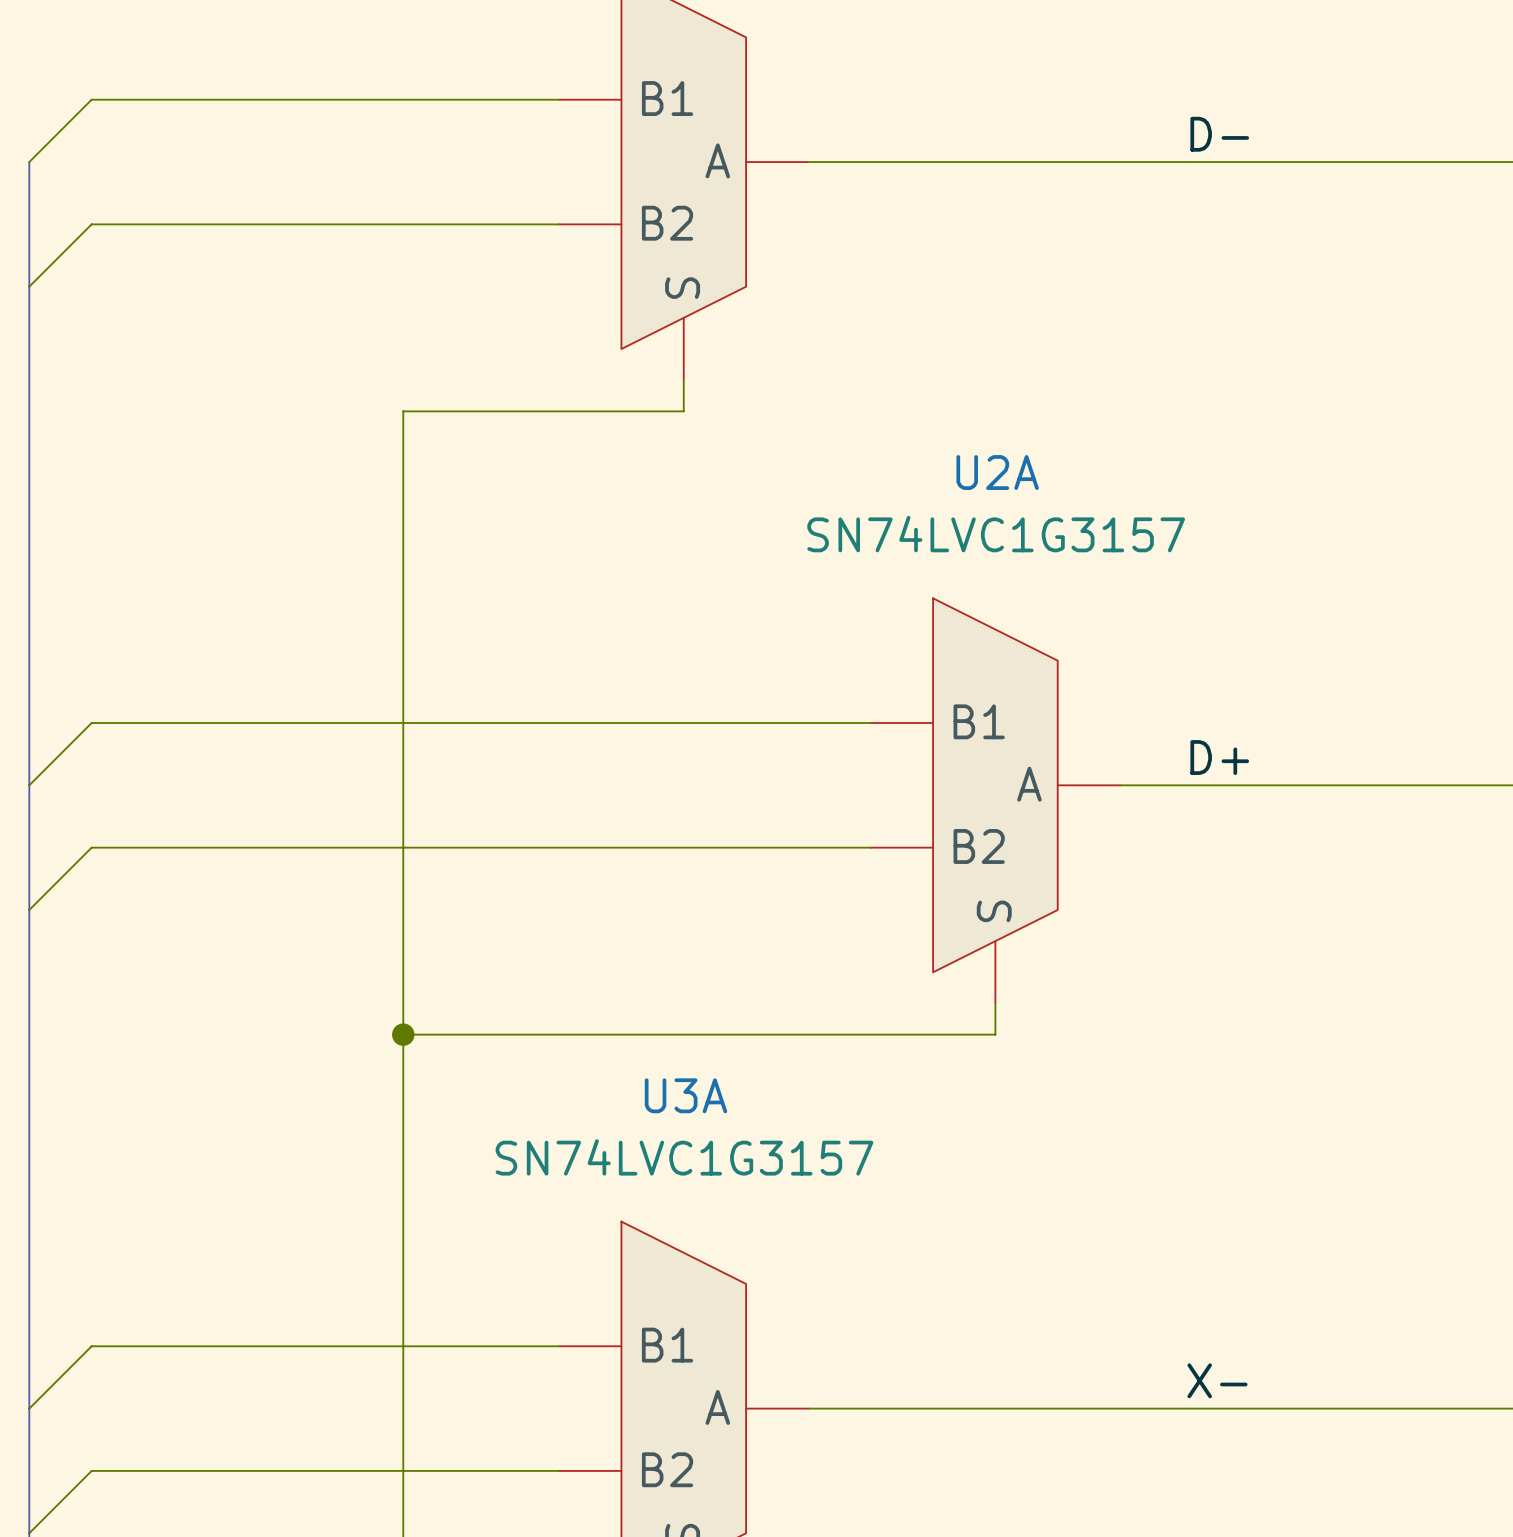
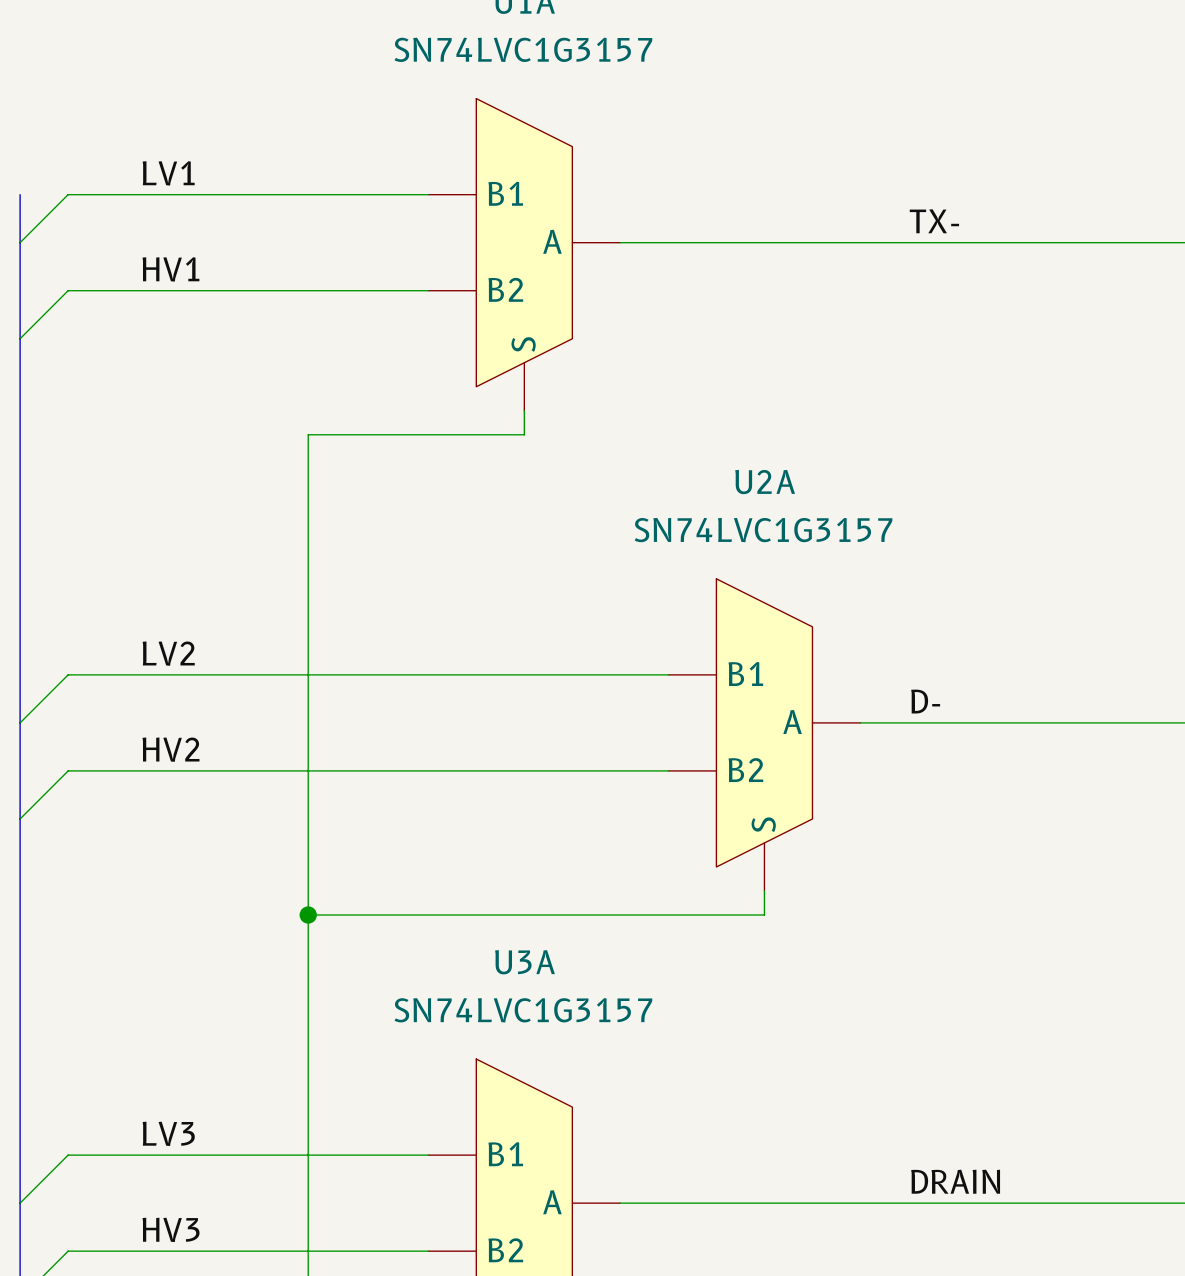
label: none -> LV1 (168, 173)
bus: none -> (20, 194) (20, 242)
label: D- (1219, 134) -> TX- (934, 221)
label: none -> HV1 (170, 269)
label: none -> LV2 (168, 653)
label: D+ (1219, 757) -> D- (925, 701)
label: none -> HV2 (171, 749)
label: none -> LV3 (168, 1133)
label: X- (1217, 1380) -> DRAIN (955, 1181)
label: none -> HV3 (171, 1229)

